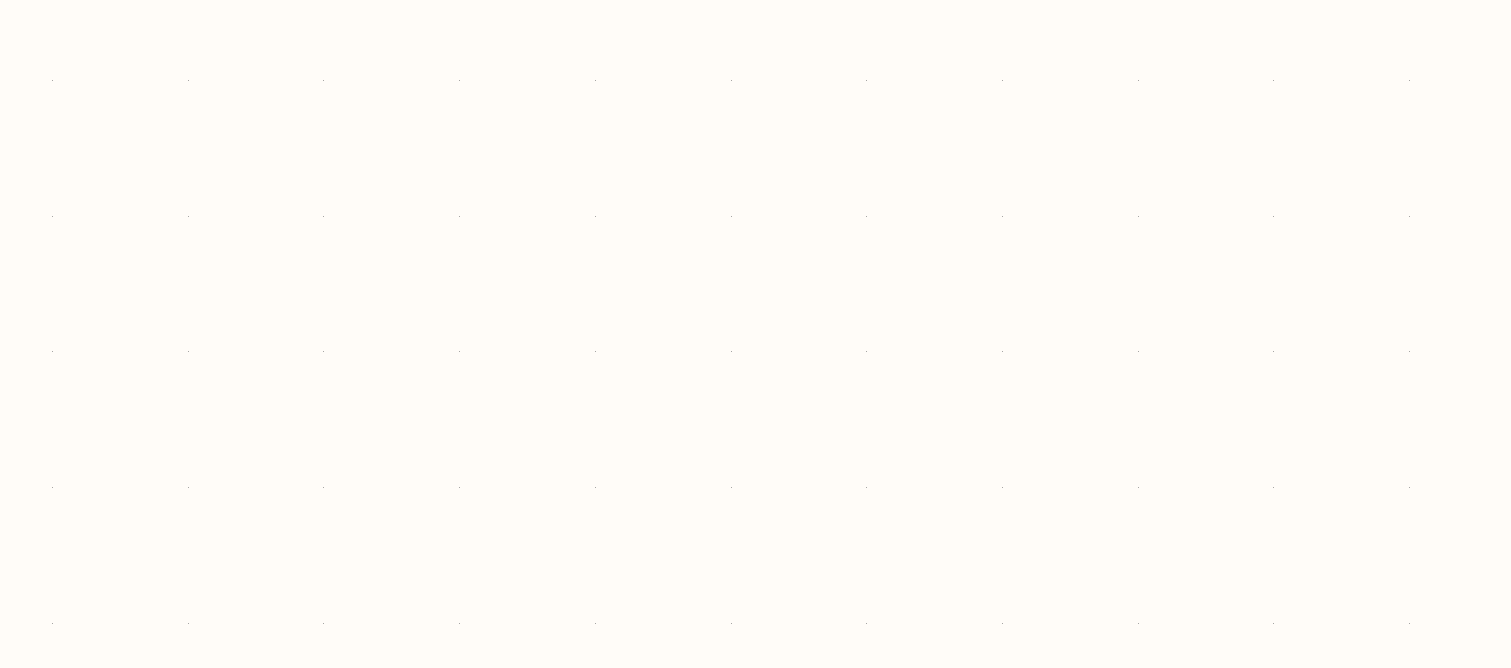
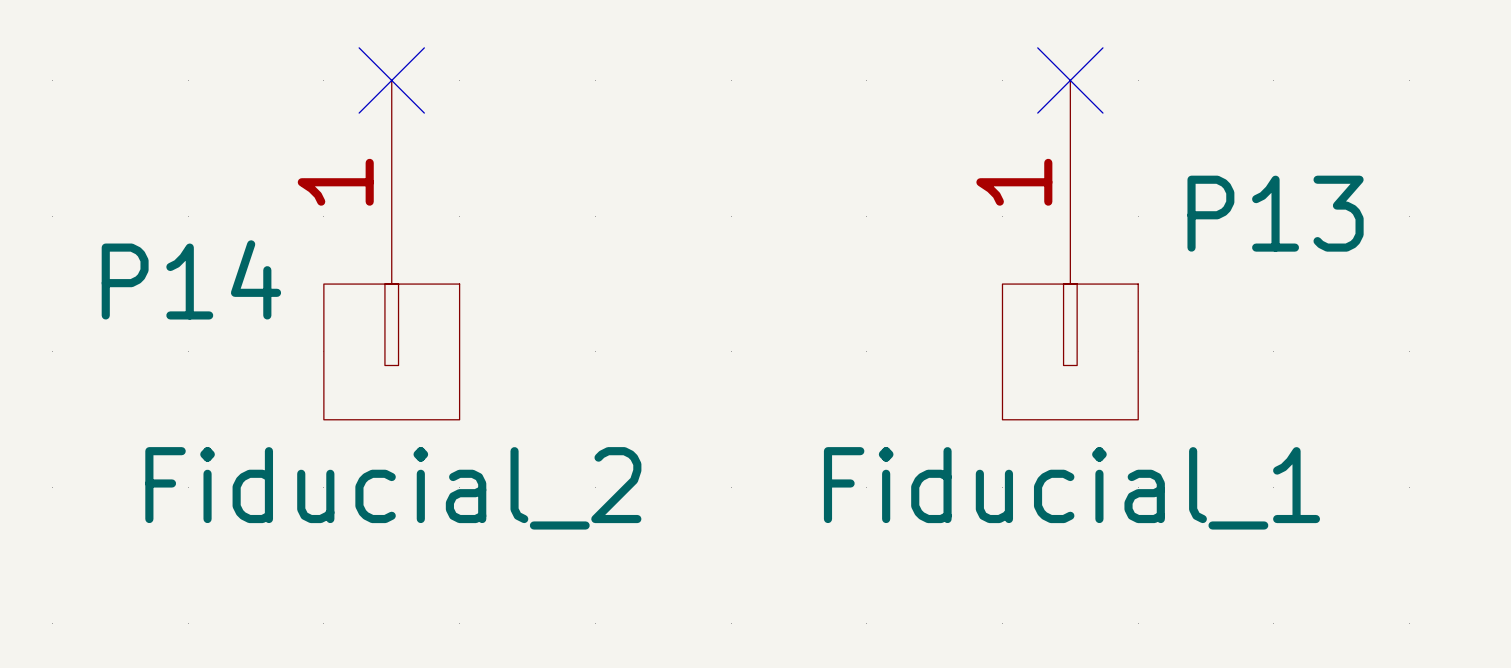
no-connect mark: none -> (391, 80)
no-connect mark: none -> (1070, 80)
P14: none -> Fiducial_2 (391, 250)
P13: none -> Fiducial_1 (1070, 250)

